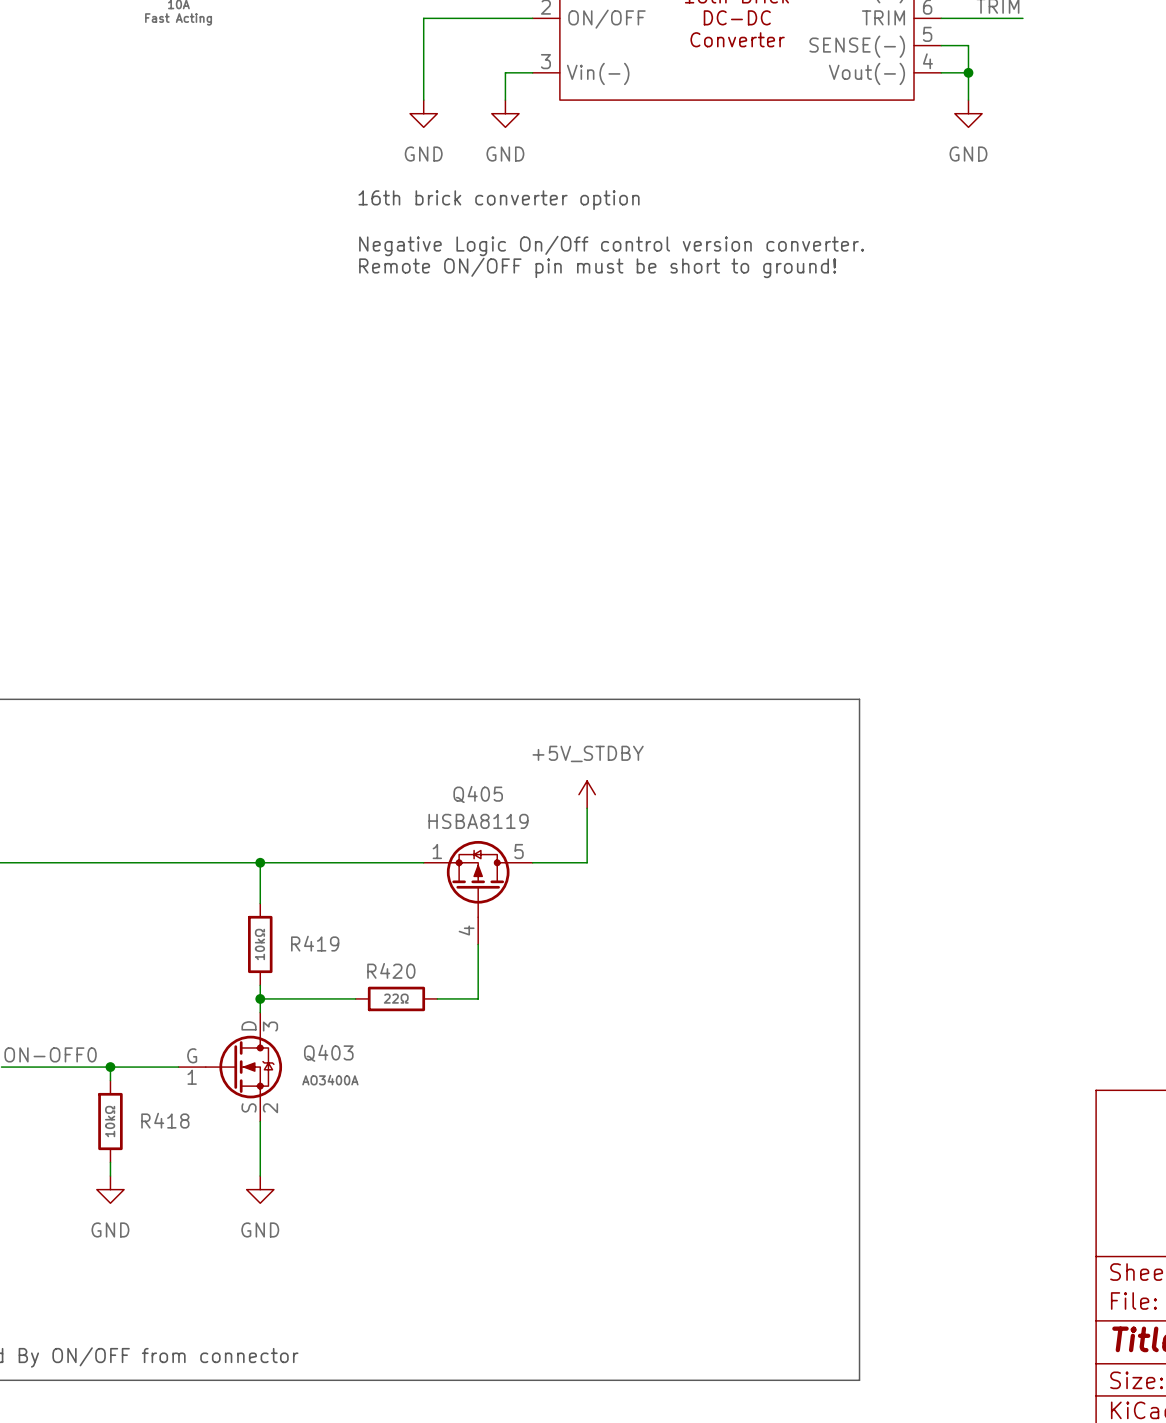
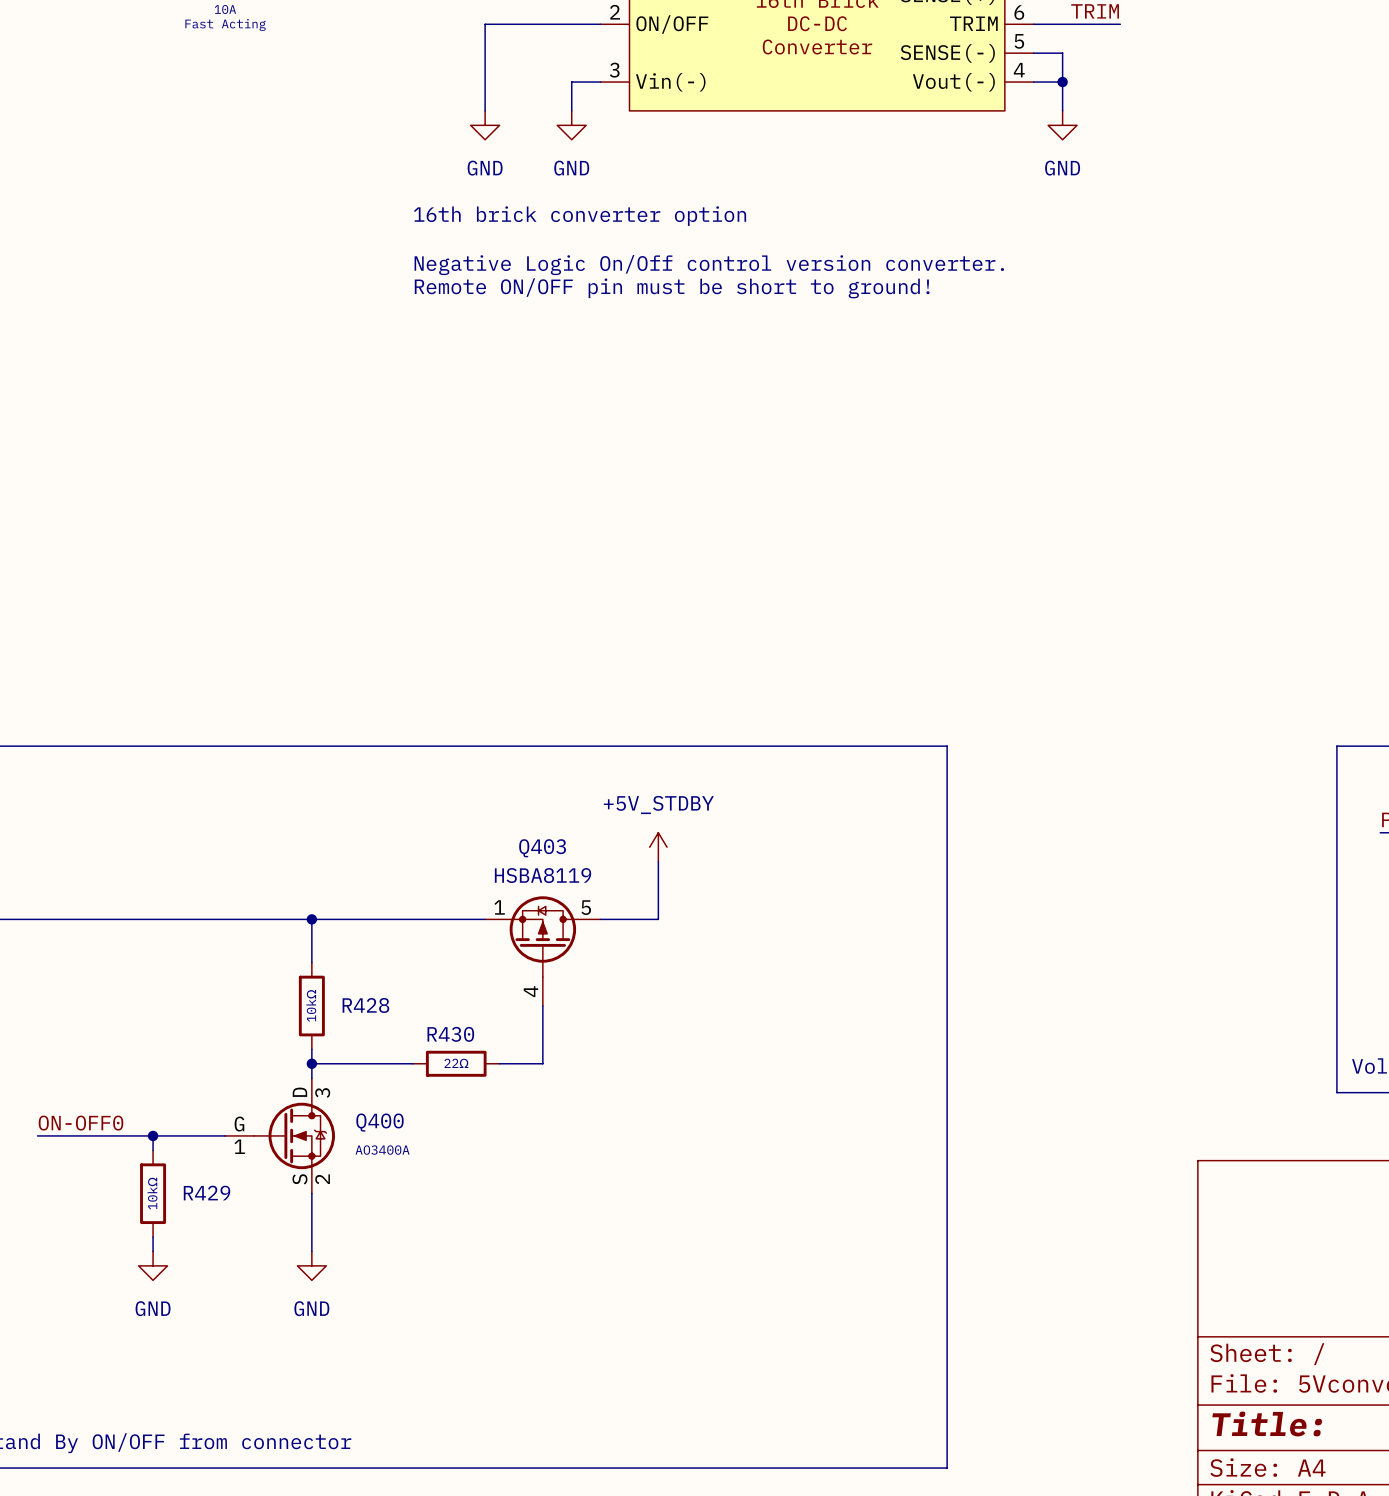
Q405 name: Q405 (478, 794) -> Q403 (542, 848)
R419 name: R419 (315, 943) -> R428 (365, 1005)
R420 name: R420 (391, 970) -> R430 (450, 1034)
Q403 name: Q403 (328, 1053) -> Q400 (380, 1122)
R418 name: R418 (165, 1120) -> R429 (207, 1193)

